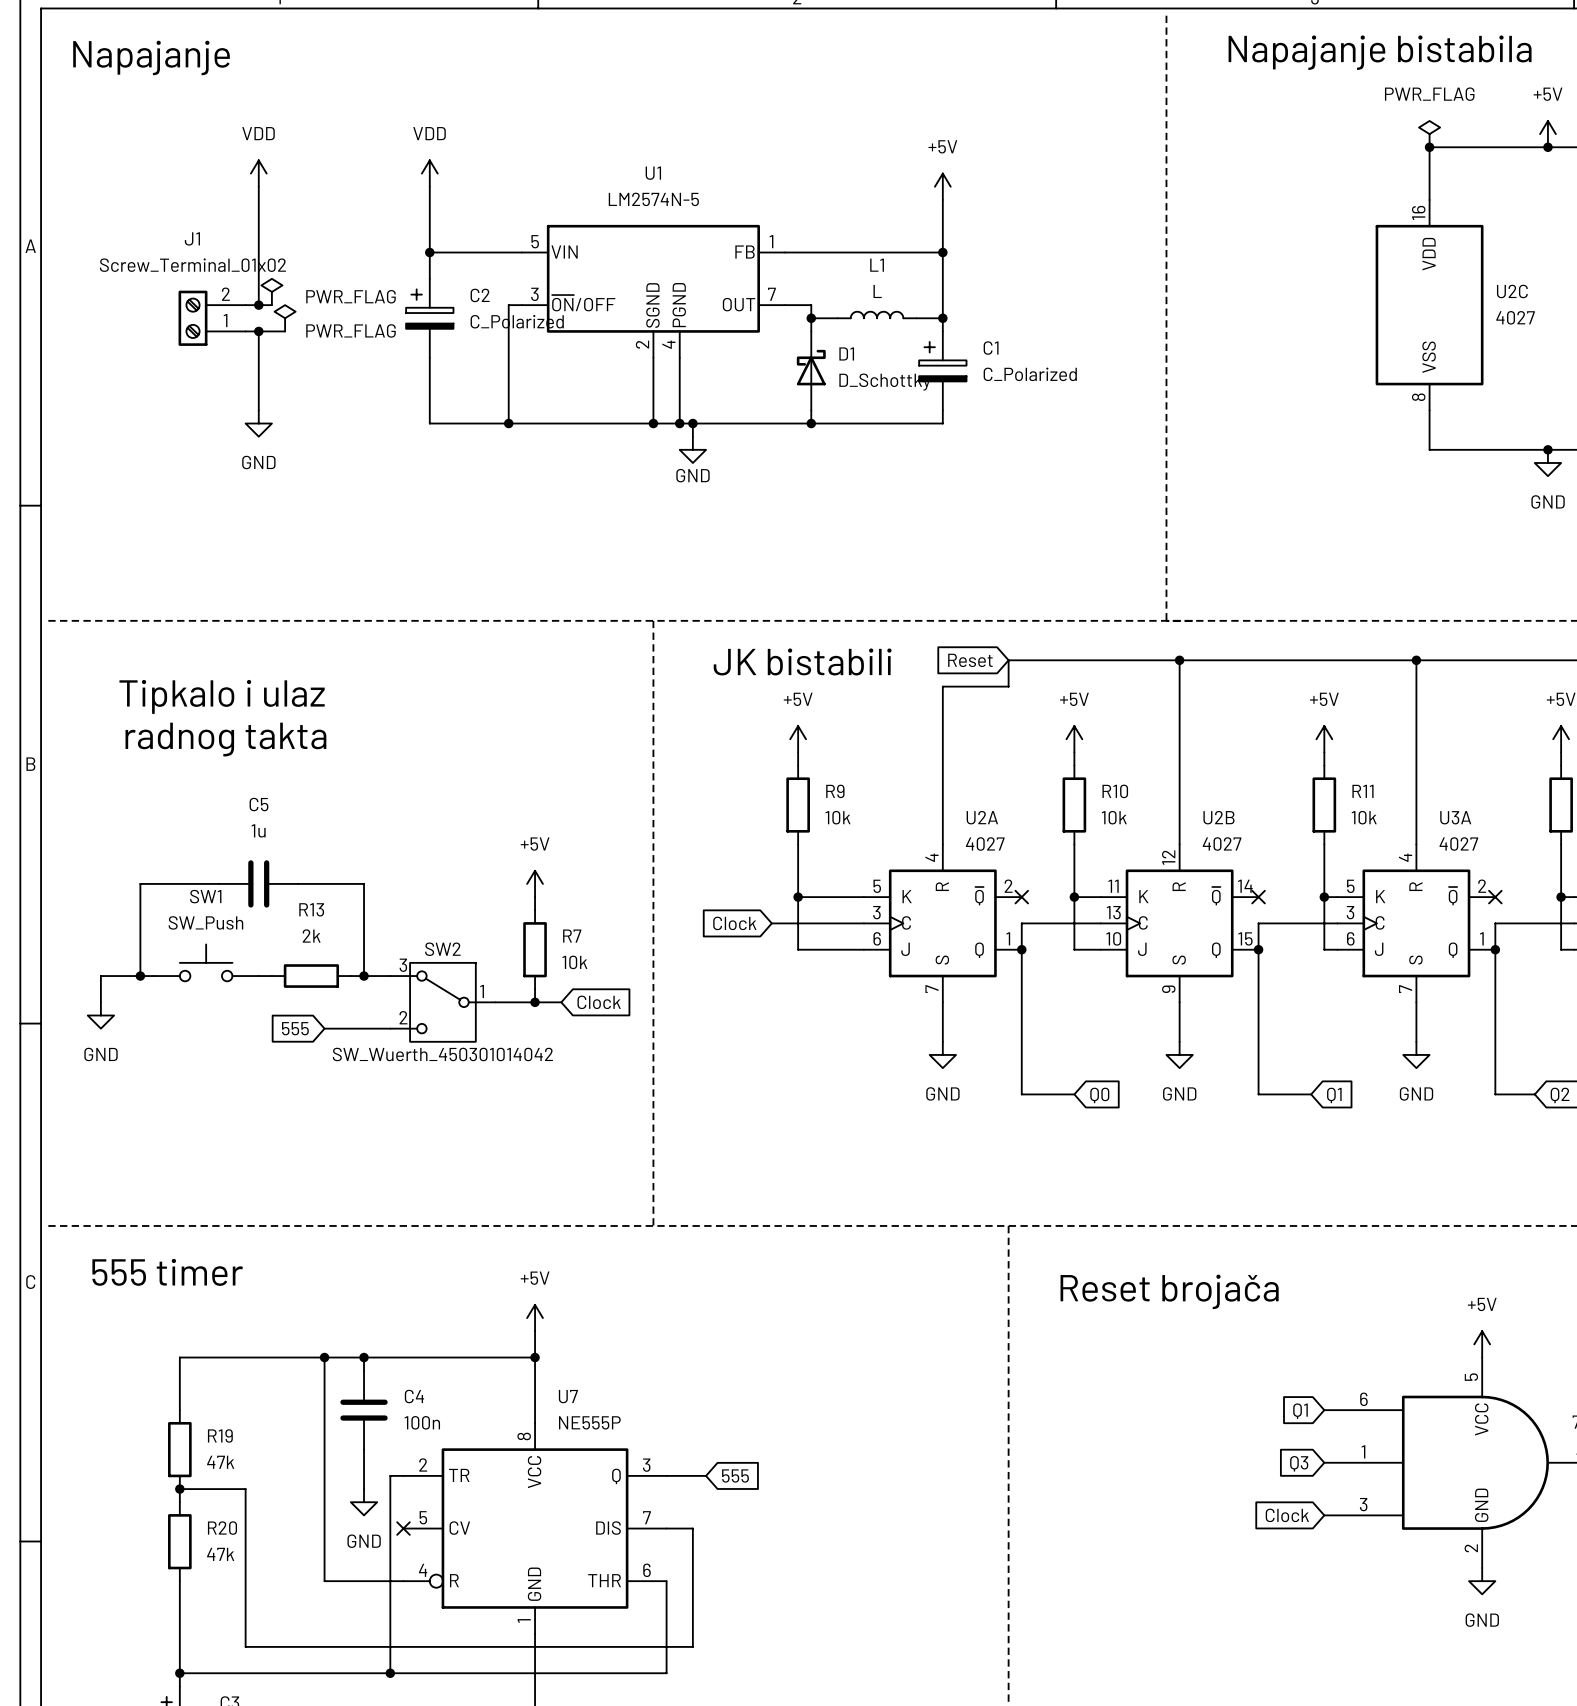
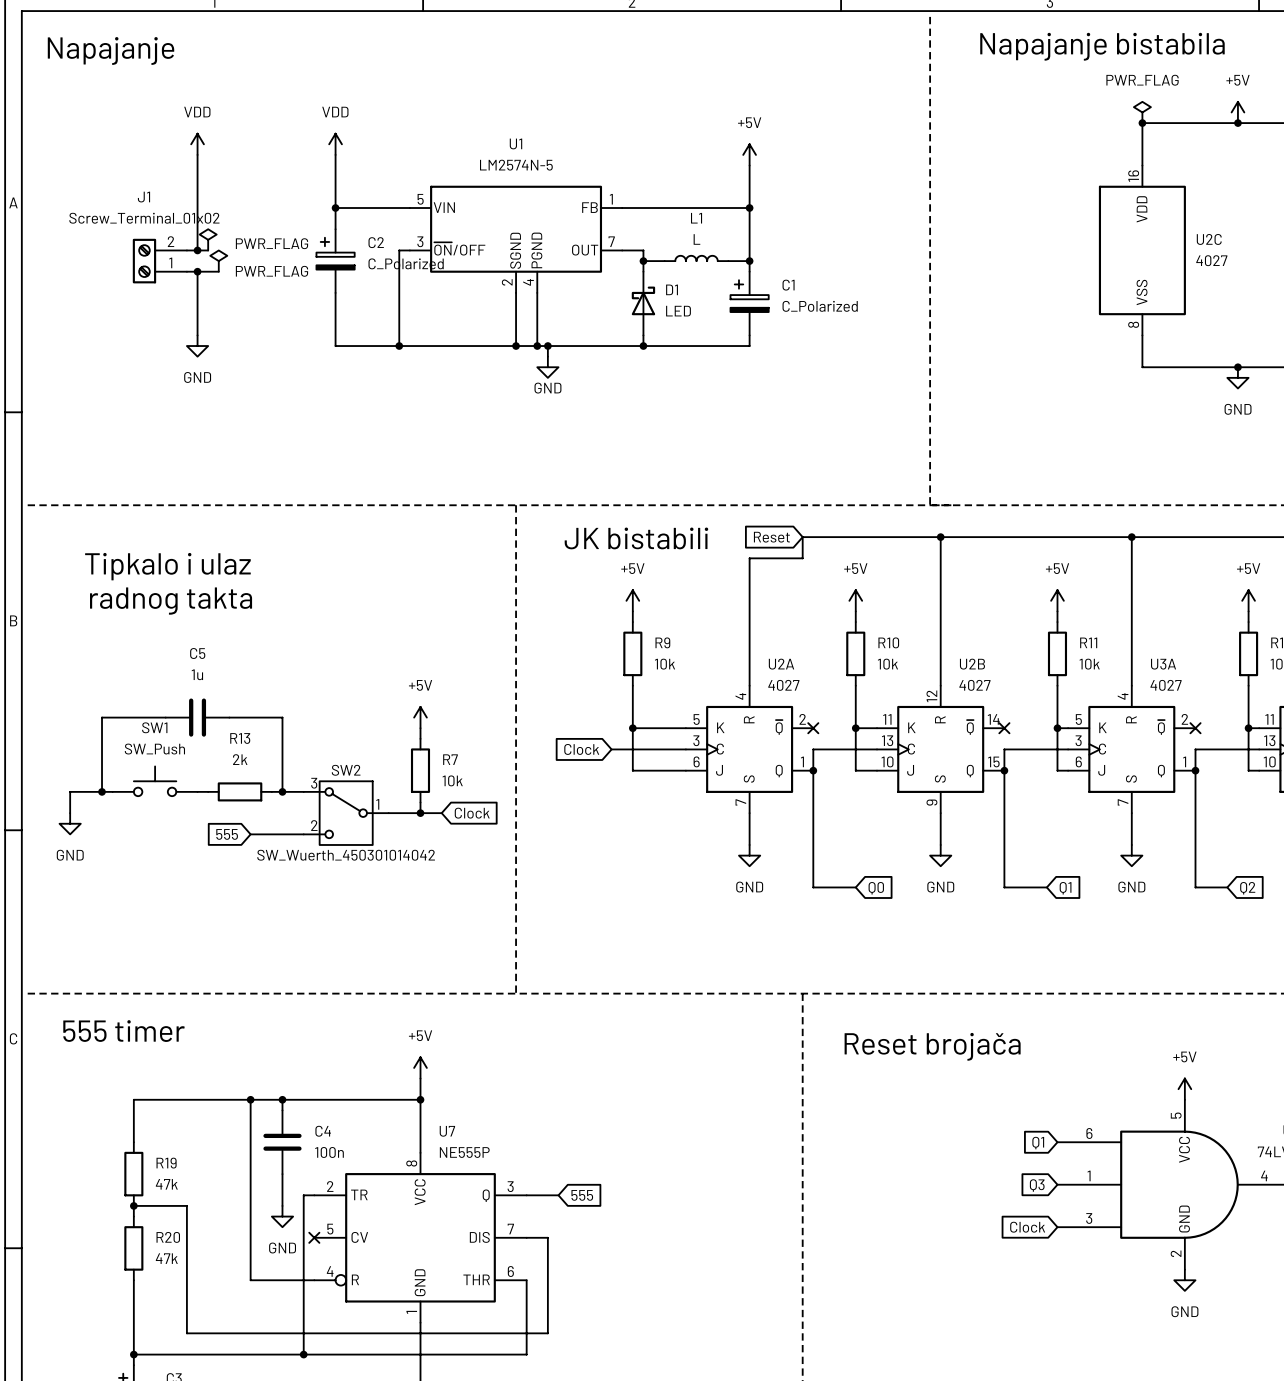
D1 value: D_Schottky (885, 382) -> LED (678, 311)

